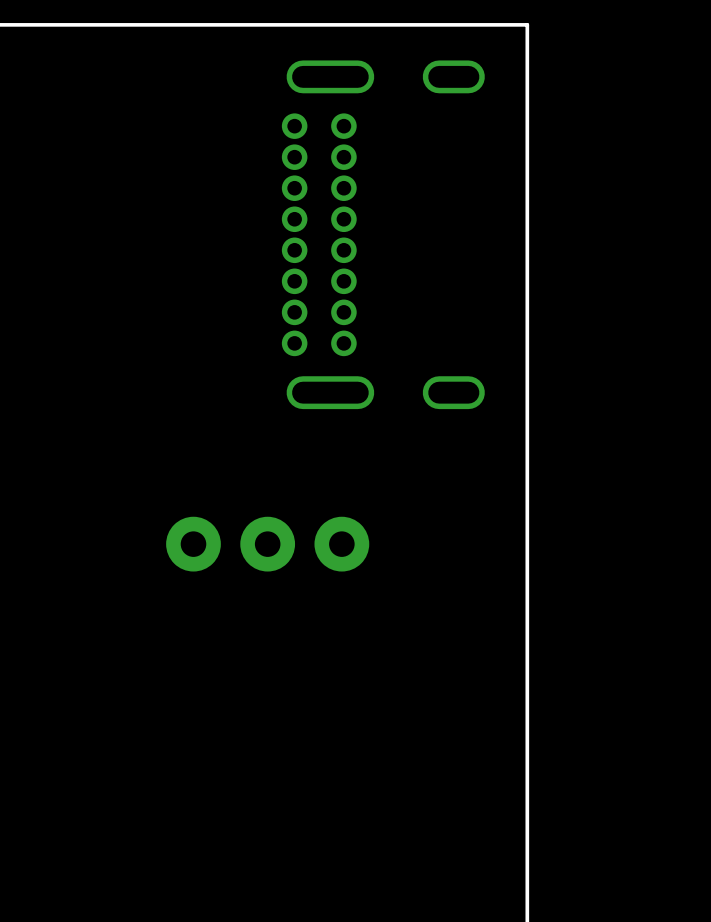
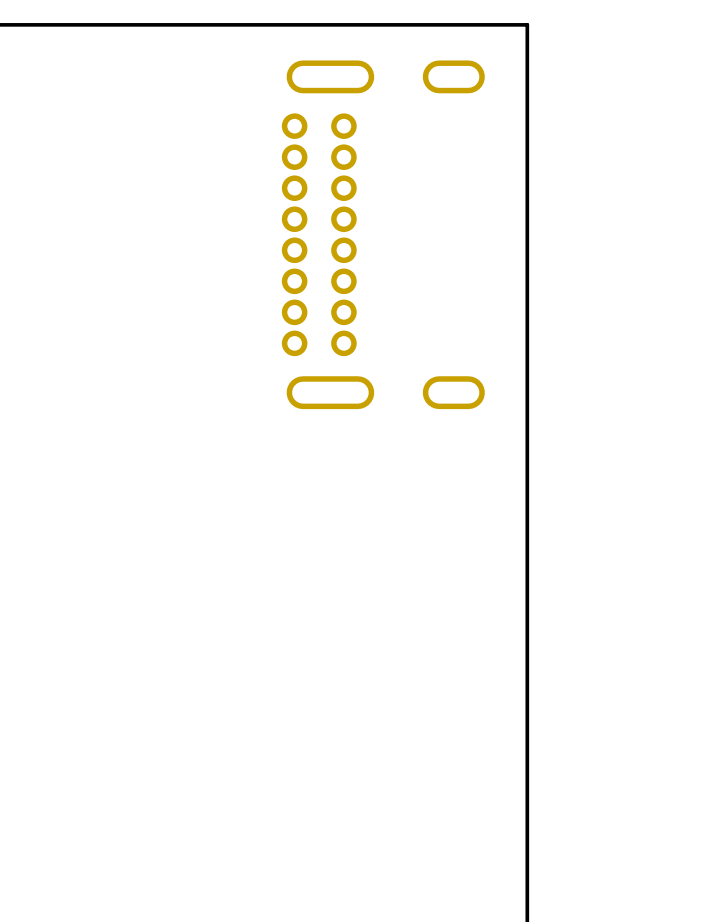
part: (193, 544) -> none
part: (267, 544) -> none
part: (341, 544) -> none

